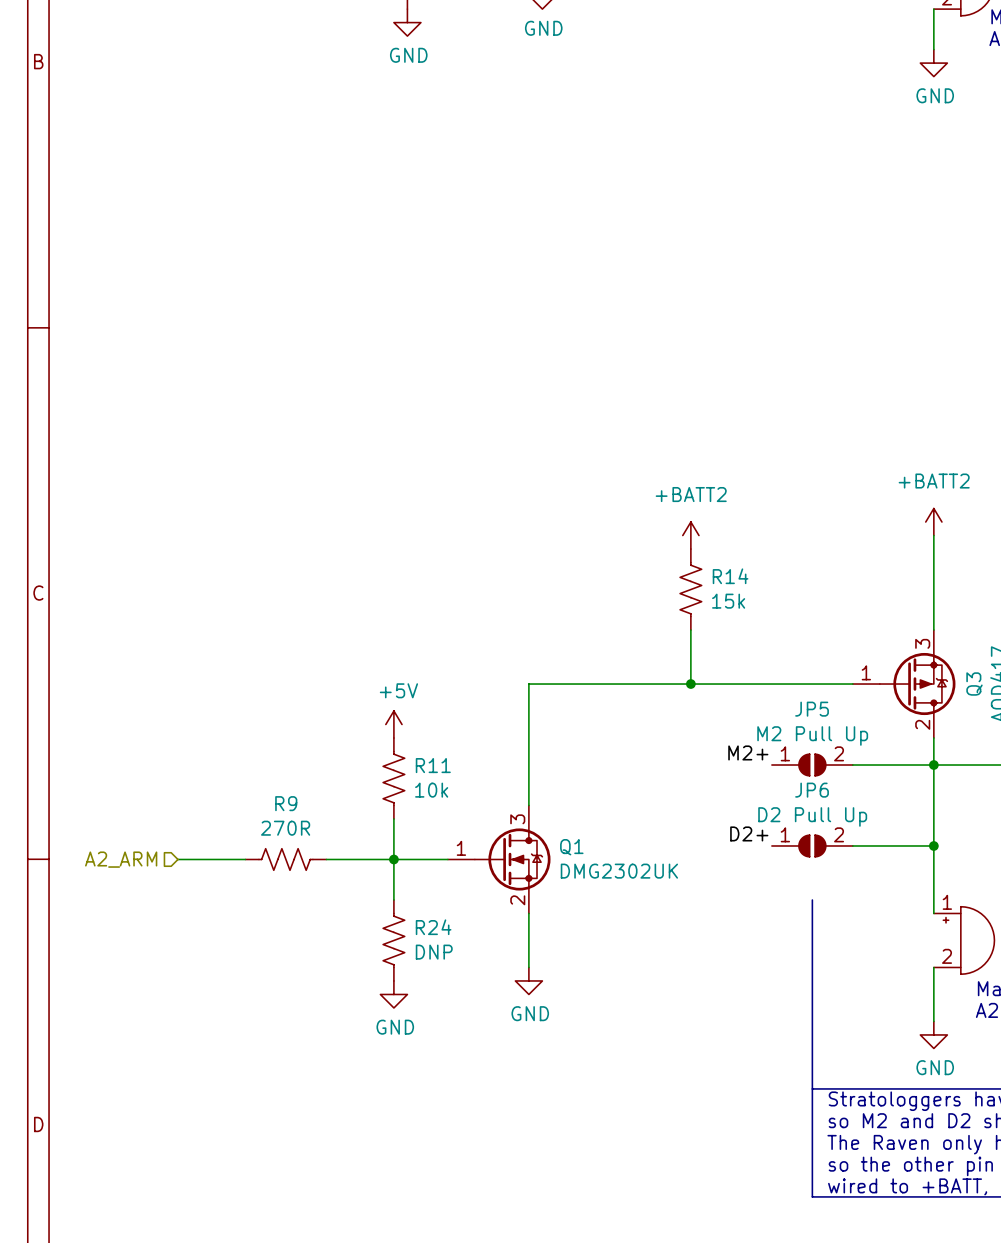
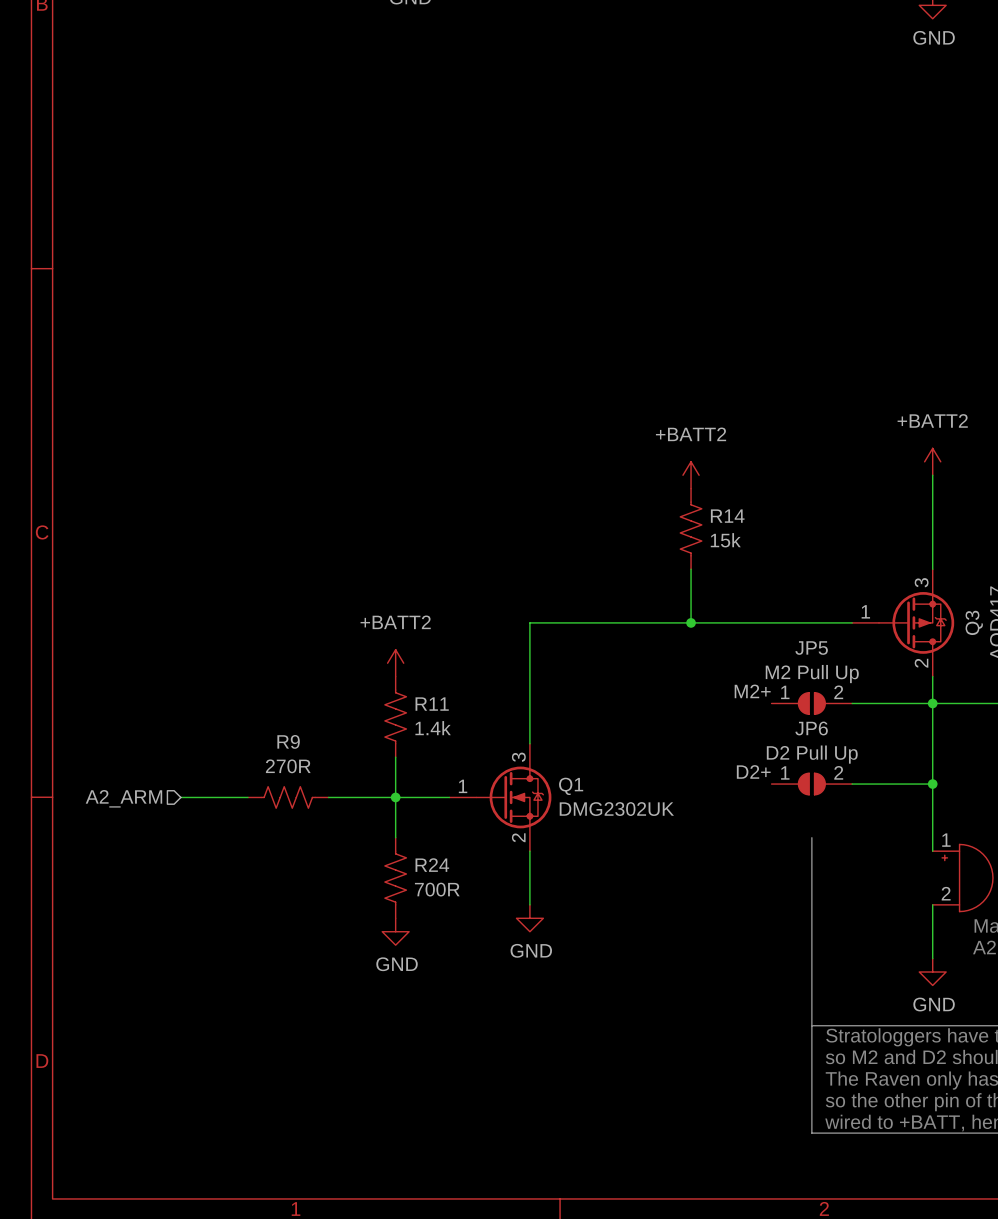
power symbol: +5V (393, 724) -> +BATT2 (395, 663)
R11 value: 10k (431, 790) -> 1.4k (433, 728)
R24 value: DNP (434, 952) -> 700R (437, 889)

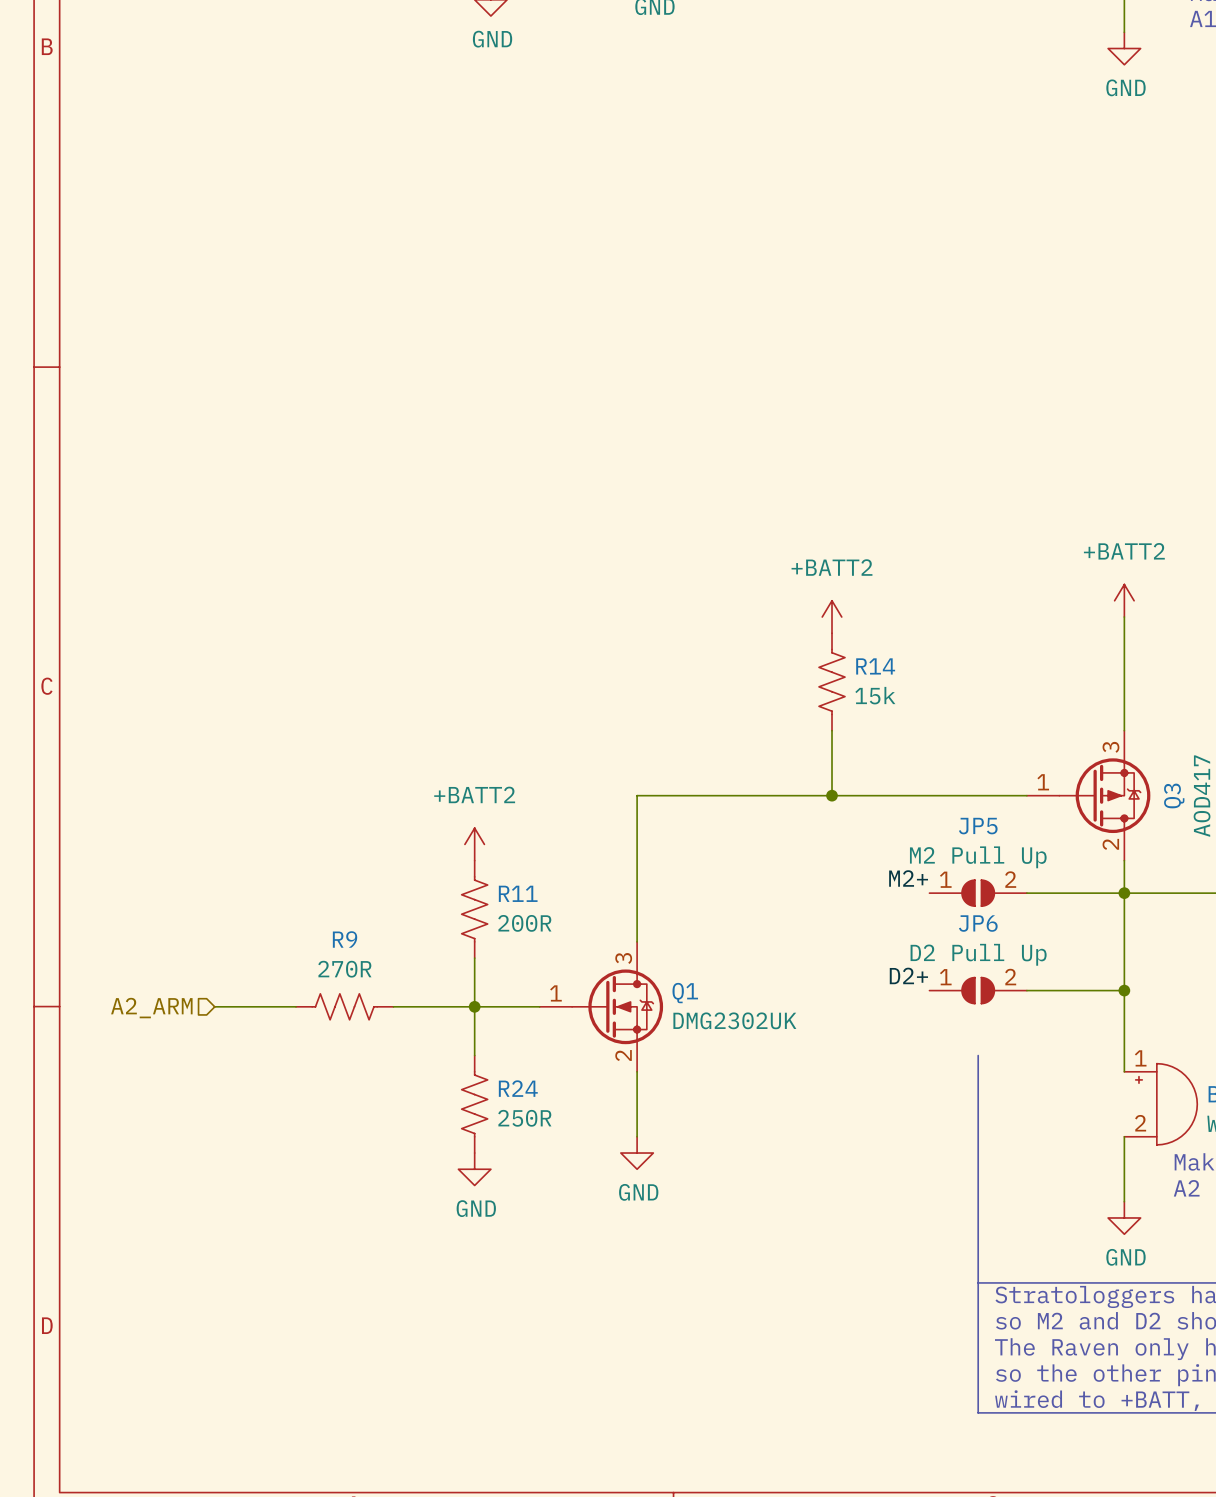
R11 value: 1.4k (433, 728) -> 200R (524, 923)
R24 value: 700R (437, 889) -> 250R (524, 1118)

